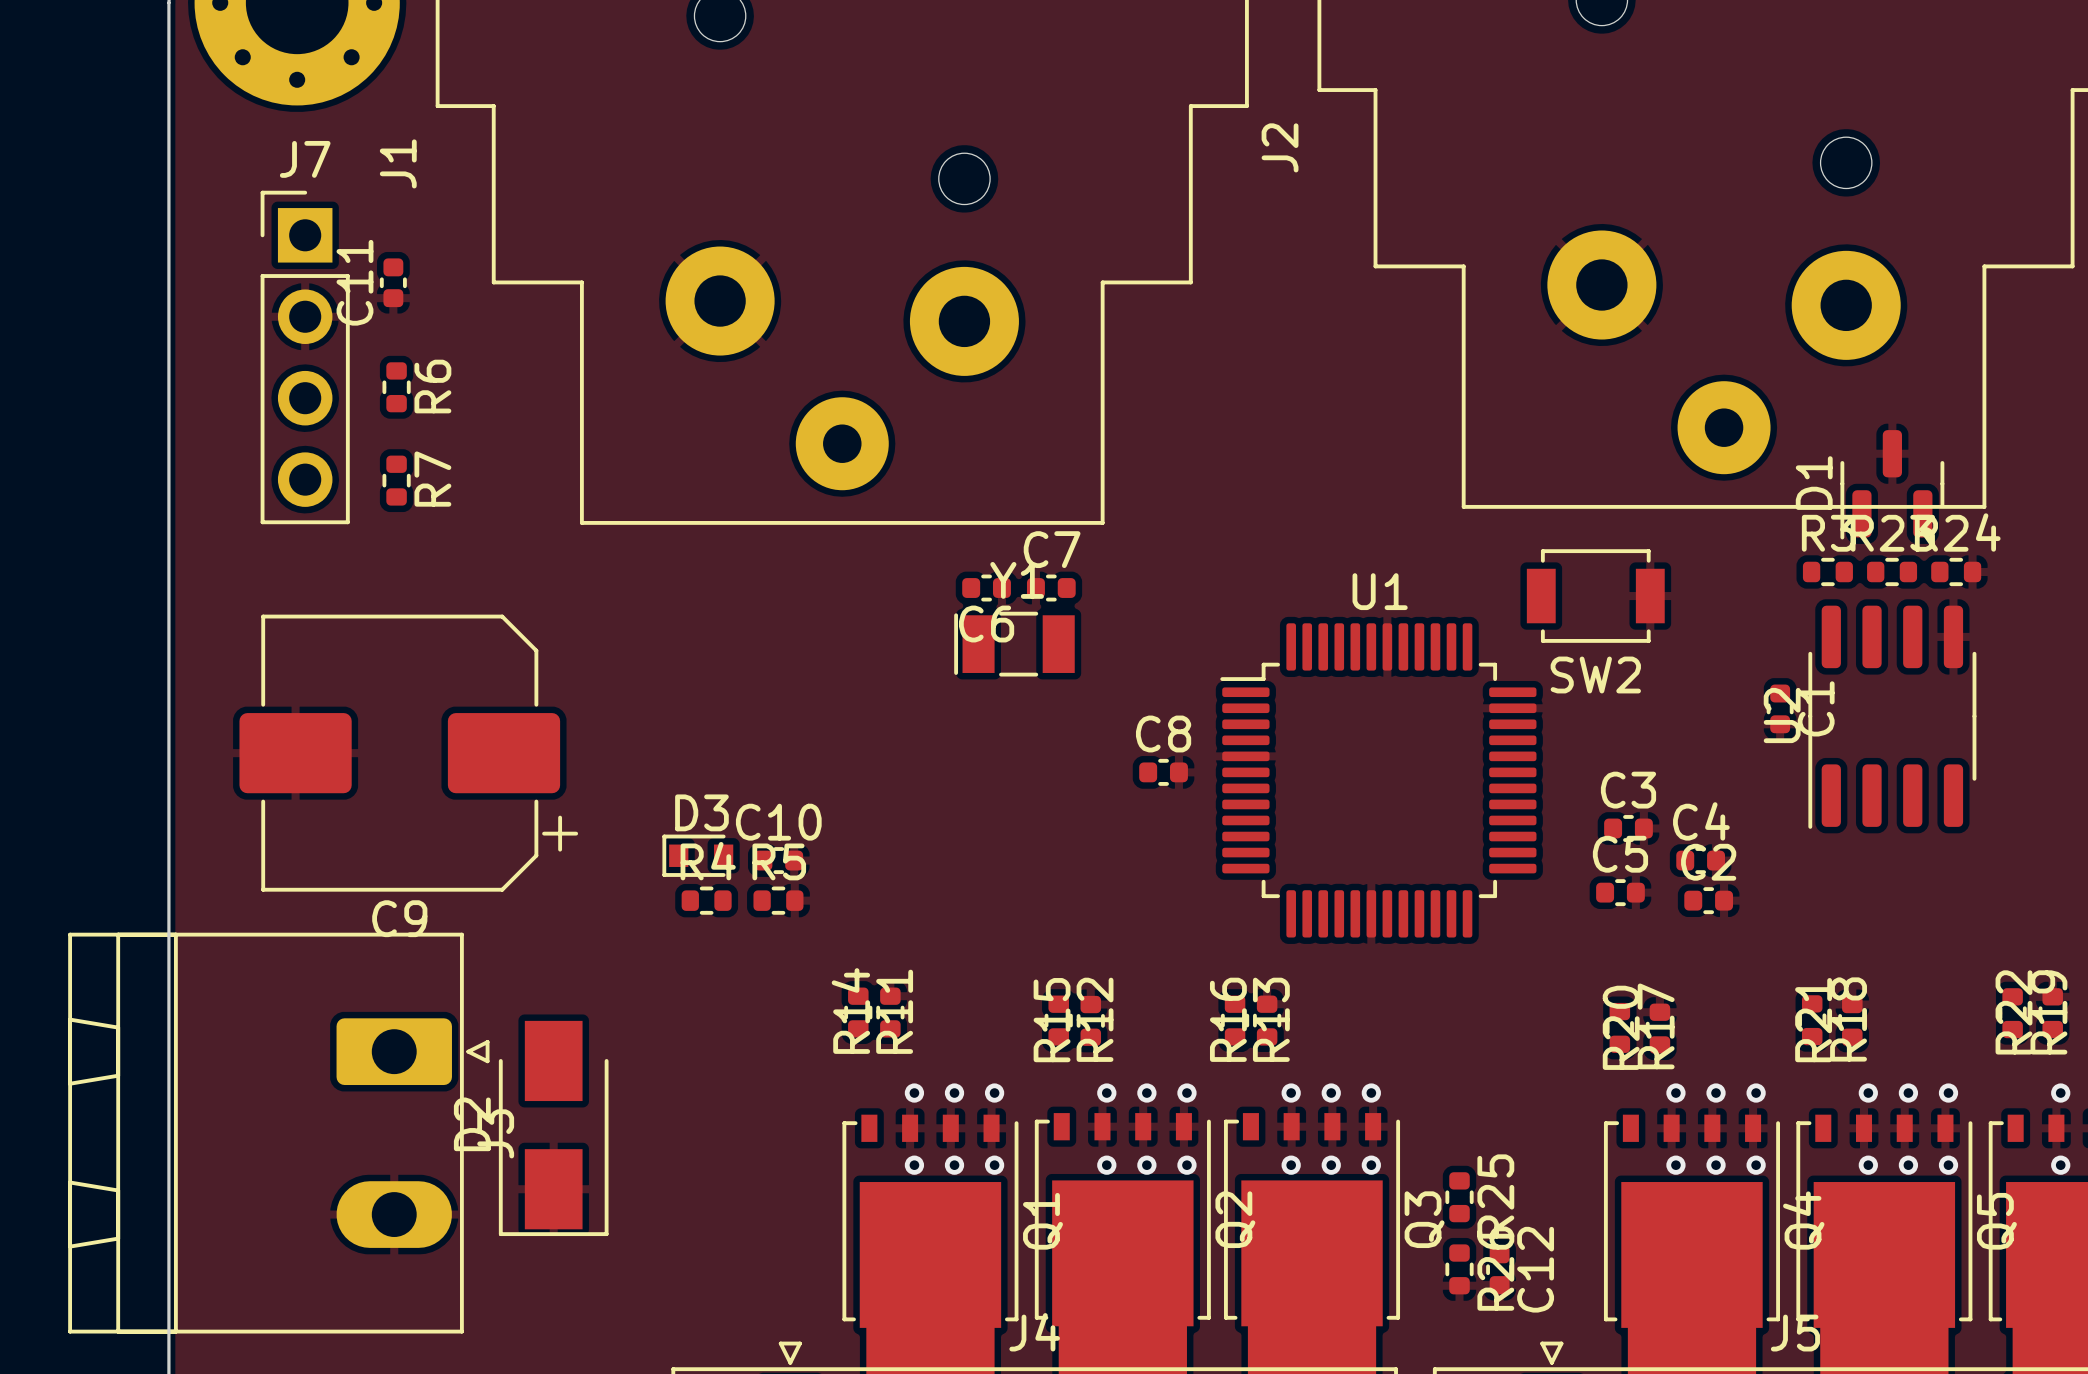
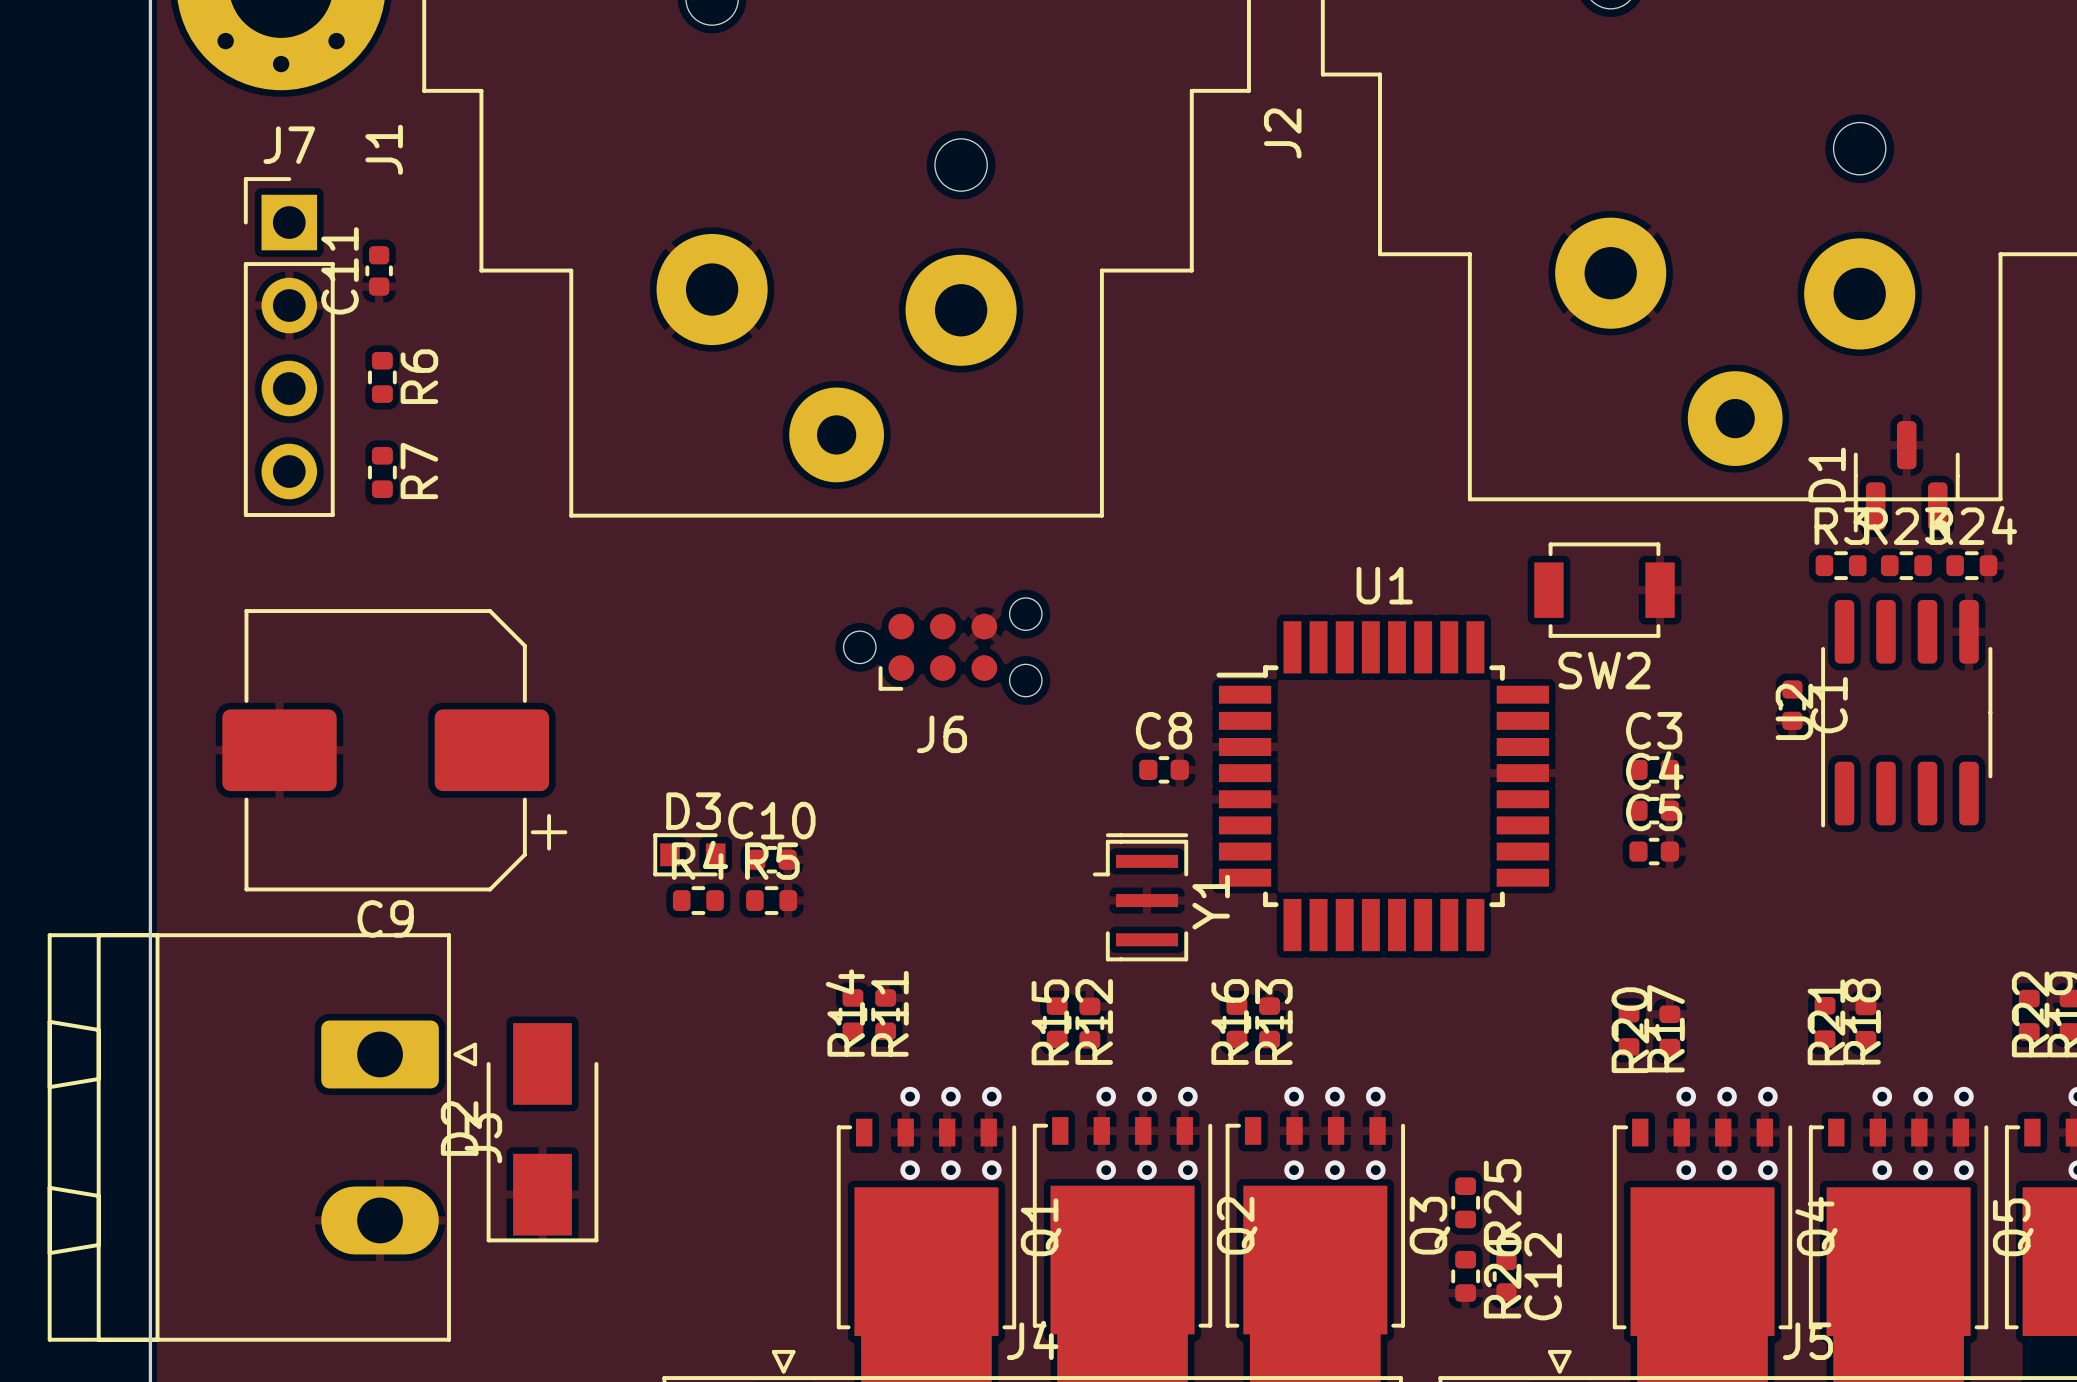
Y1 name position: Y1 (1017, 580) -> Y1 (1211, 902)
C6: (986, 588) -> none
C7: (1051, 588) -> none
Y1 footprint: [954, 611, 1075, 677] -> [1092, 833, 1189, 962]
U1 footprint: [1220, 623, 1537, 938] -> [1216, 621, 1549, 952]
J6: none -> (942, 647)
C3 position: (1628, 828) -> (1654, 769)
C4 position: (1700, 860) -> (1654, 810)
C5 position: (1620, 892) -> (1654, 851)
C2: (1708, 900) -> none

